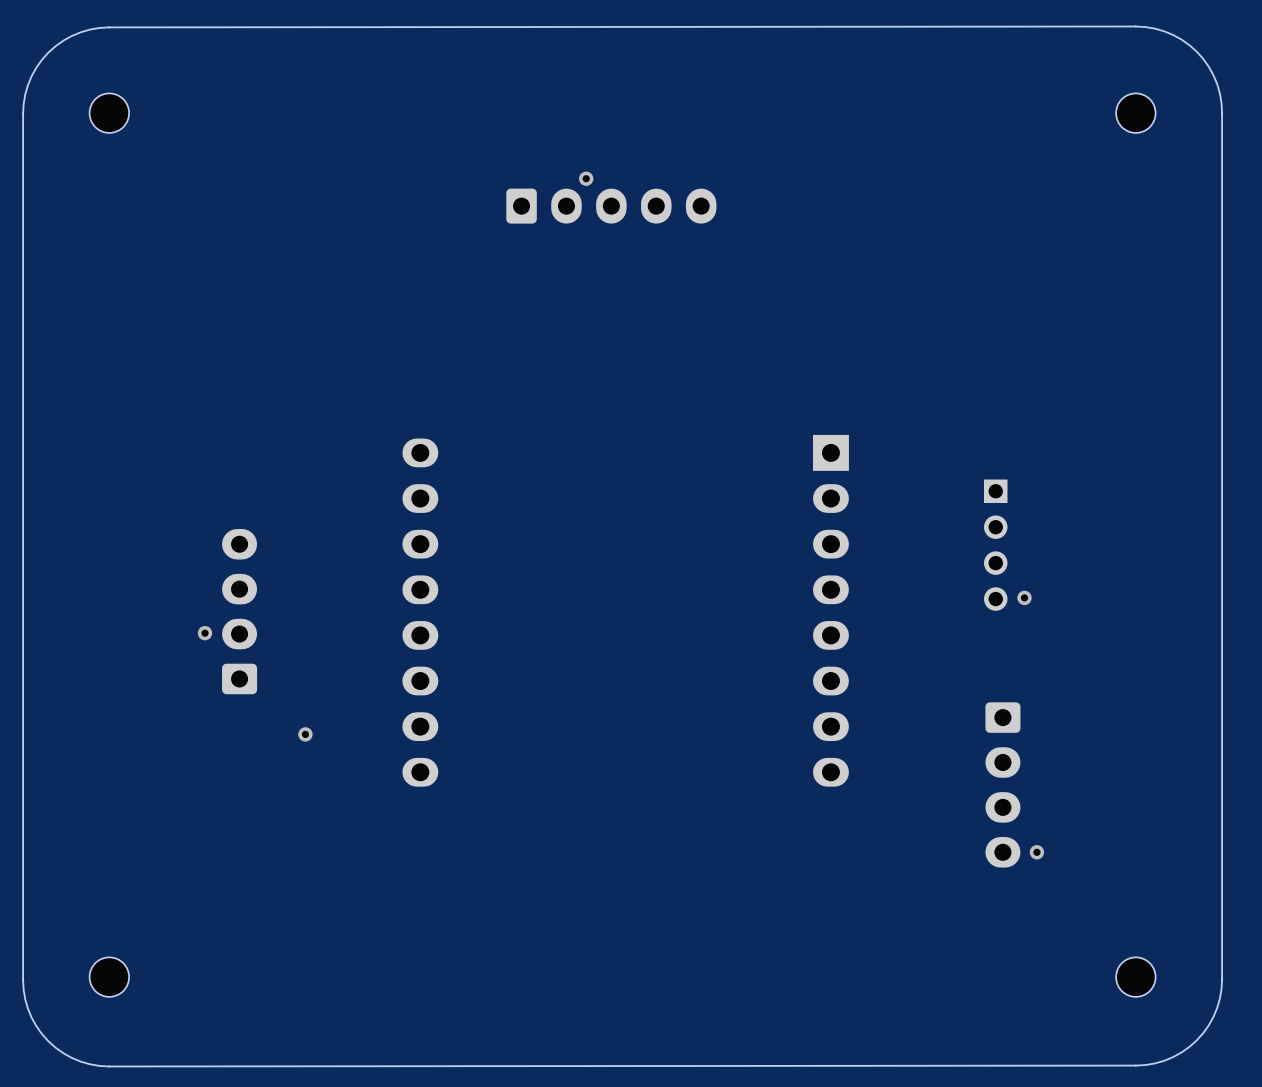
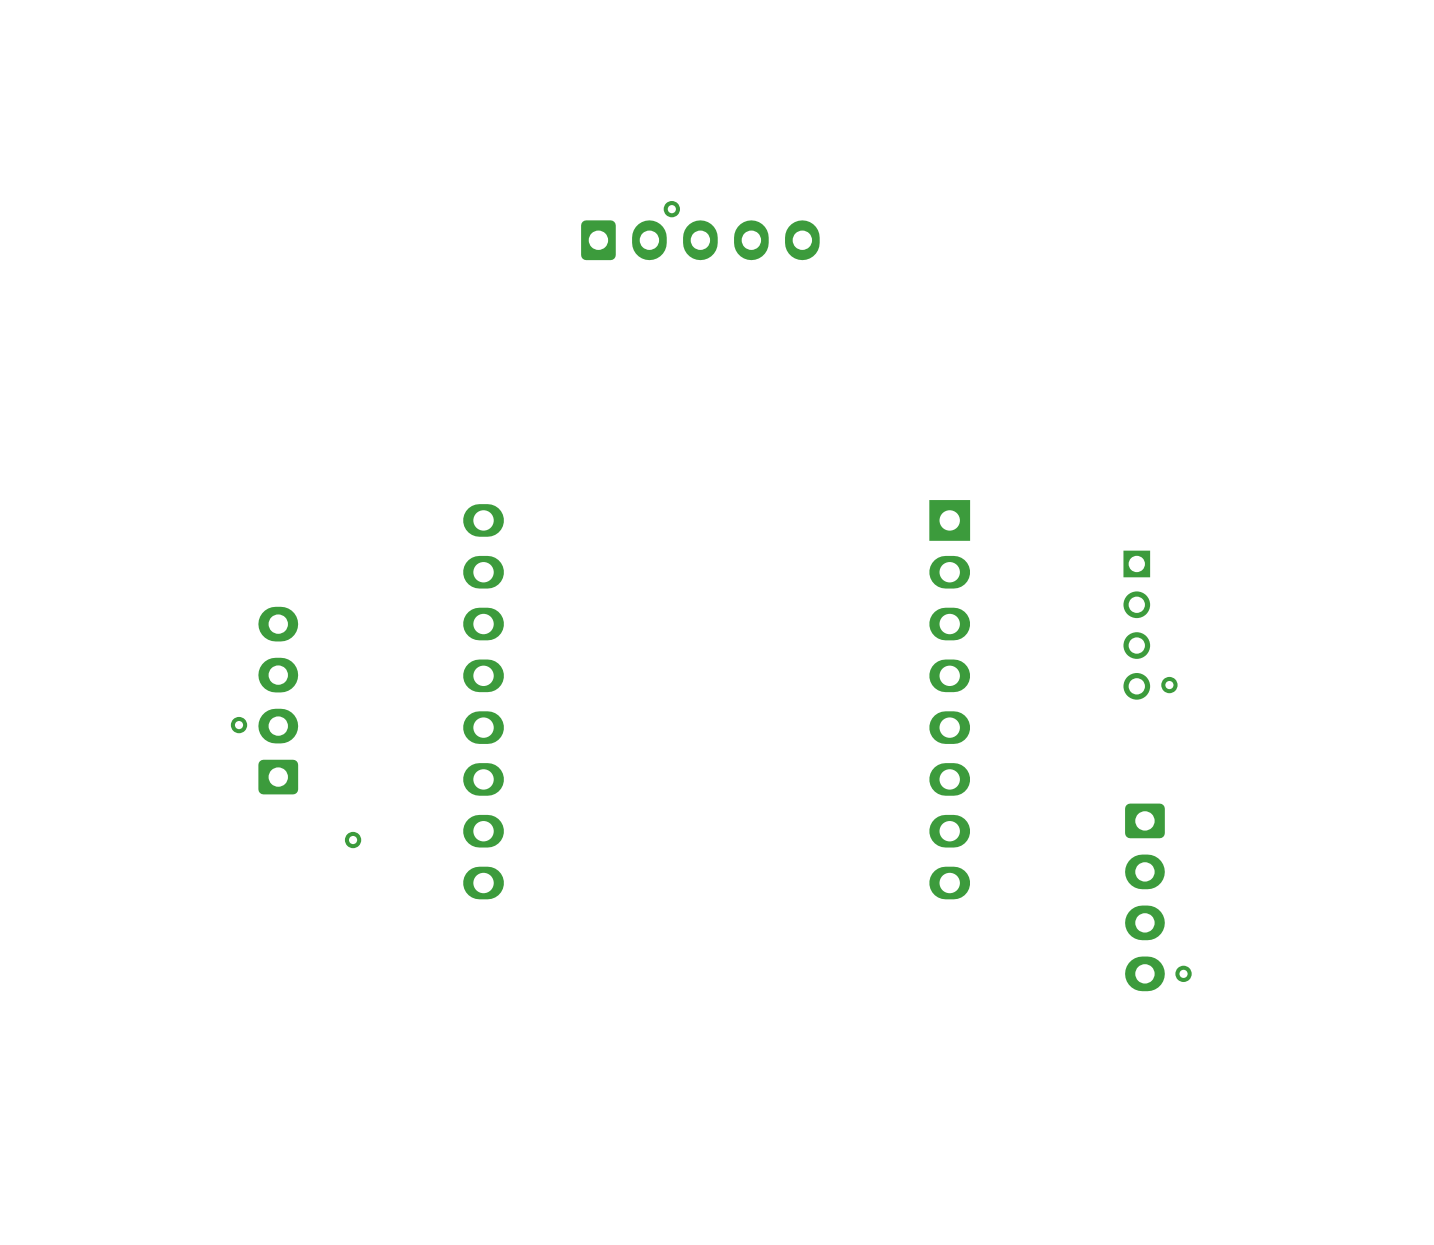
board edge: (1135, 26) (109, 27) (90, 29) (71, 35) (48, 52) (36, 67) (27, 85) (23, 113) (23, 980) (27, 1008) (36, 1026) (48, 1041) (71, 1057) (90, 1064) (109, 1066) (1135, 1065) (1155, 1063) (1173, 1057) (1196, 1040) (1213, 1016) (1219, 998) (1222, 979) (1221, 103) (1217, 84) (1208, 66) (1189, 45) (1164, 31) (1135, 26) -> none
part: (109, 113) -> none
part: (1135, 113) -> none
part: (109, 977) -> none
part: (1135, 977) -> none

